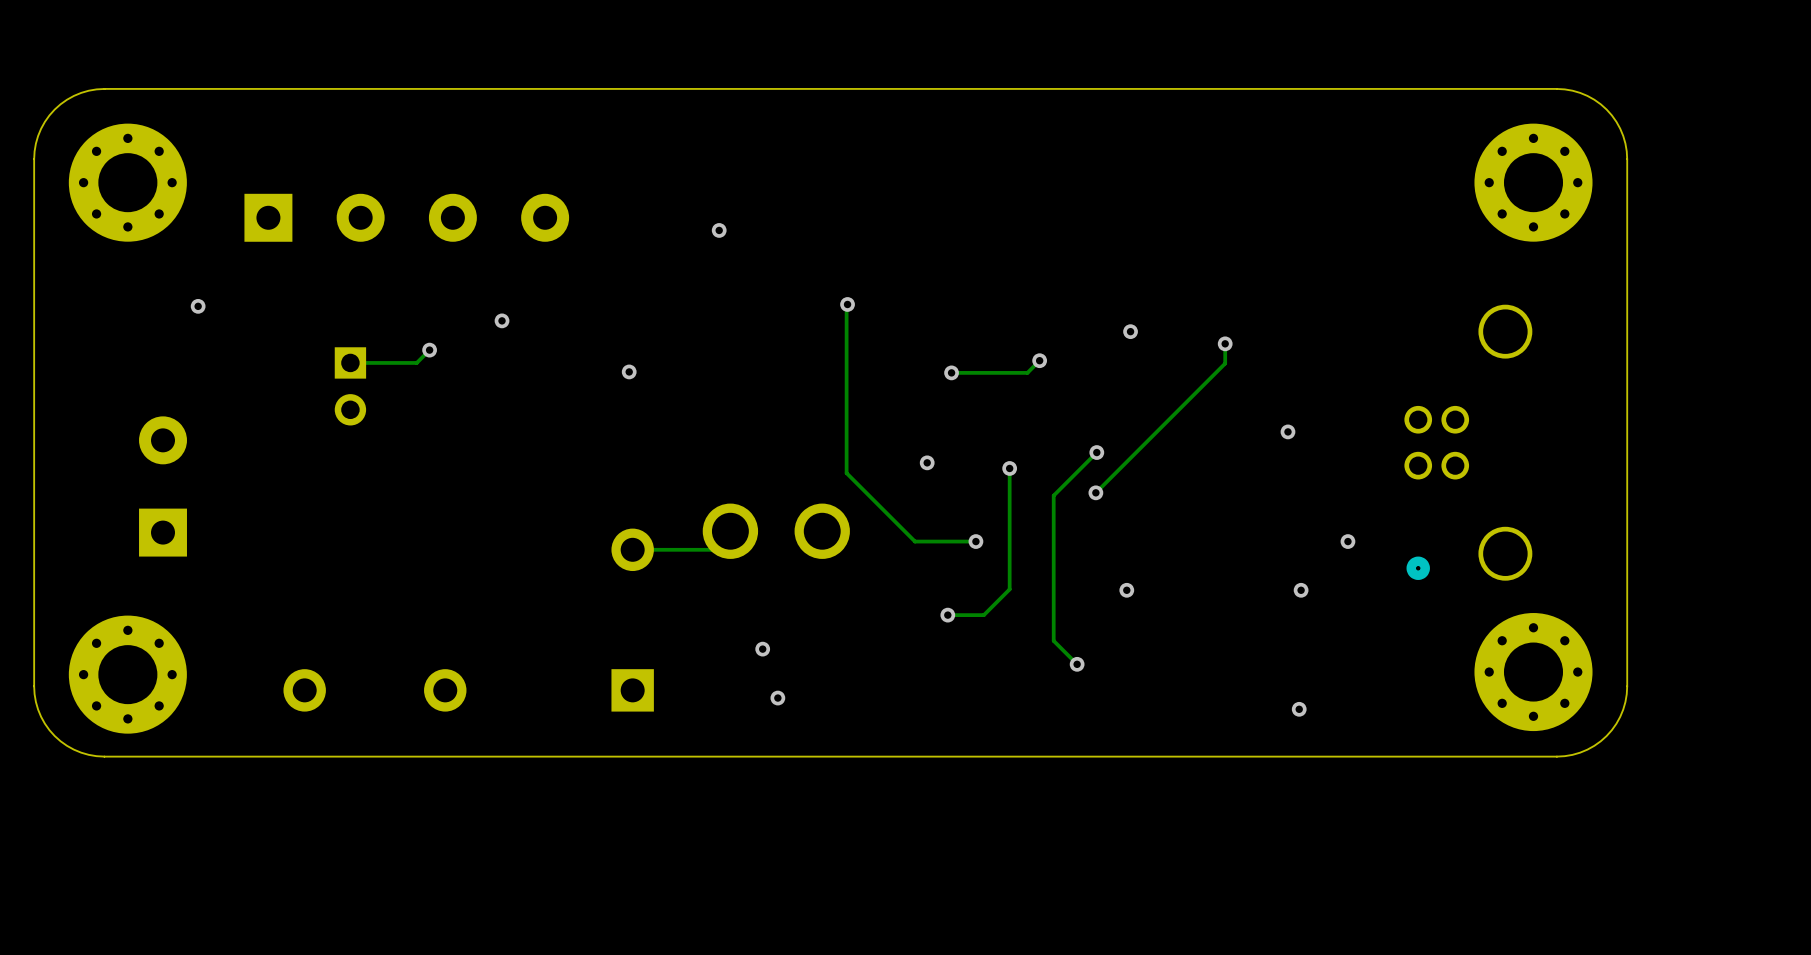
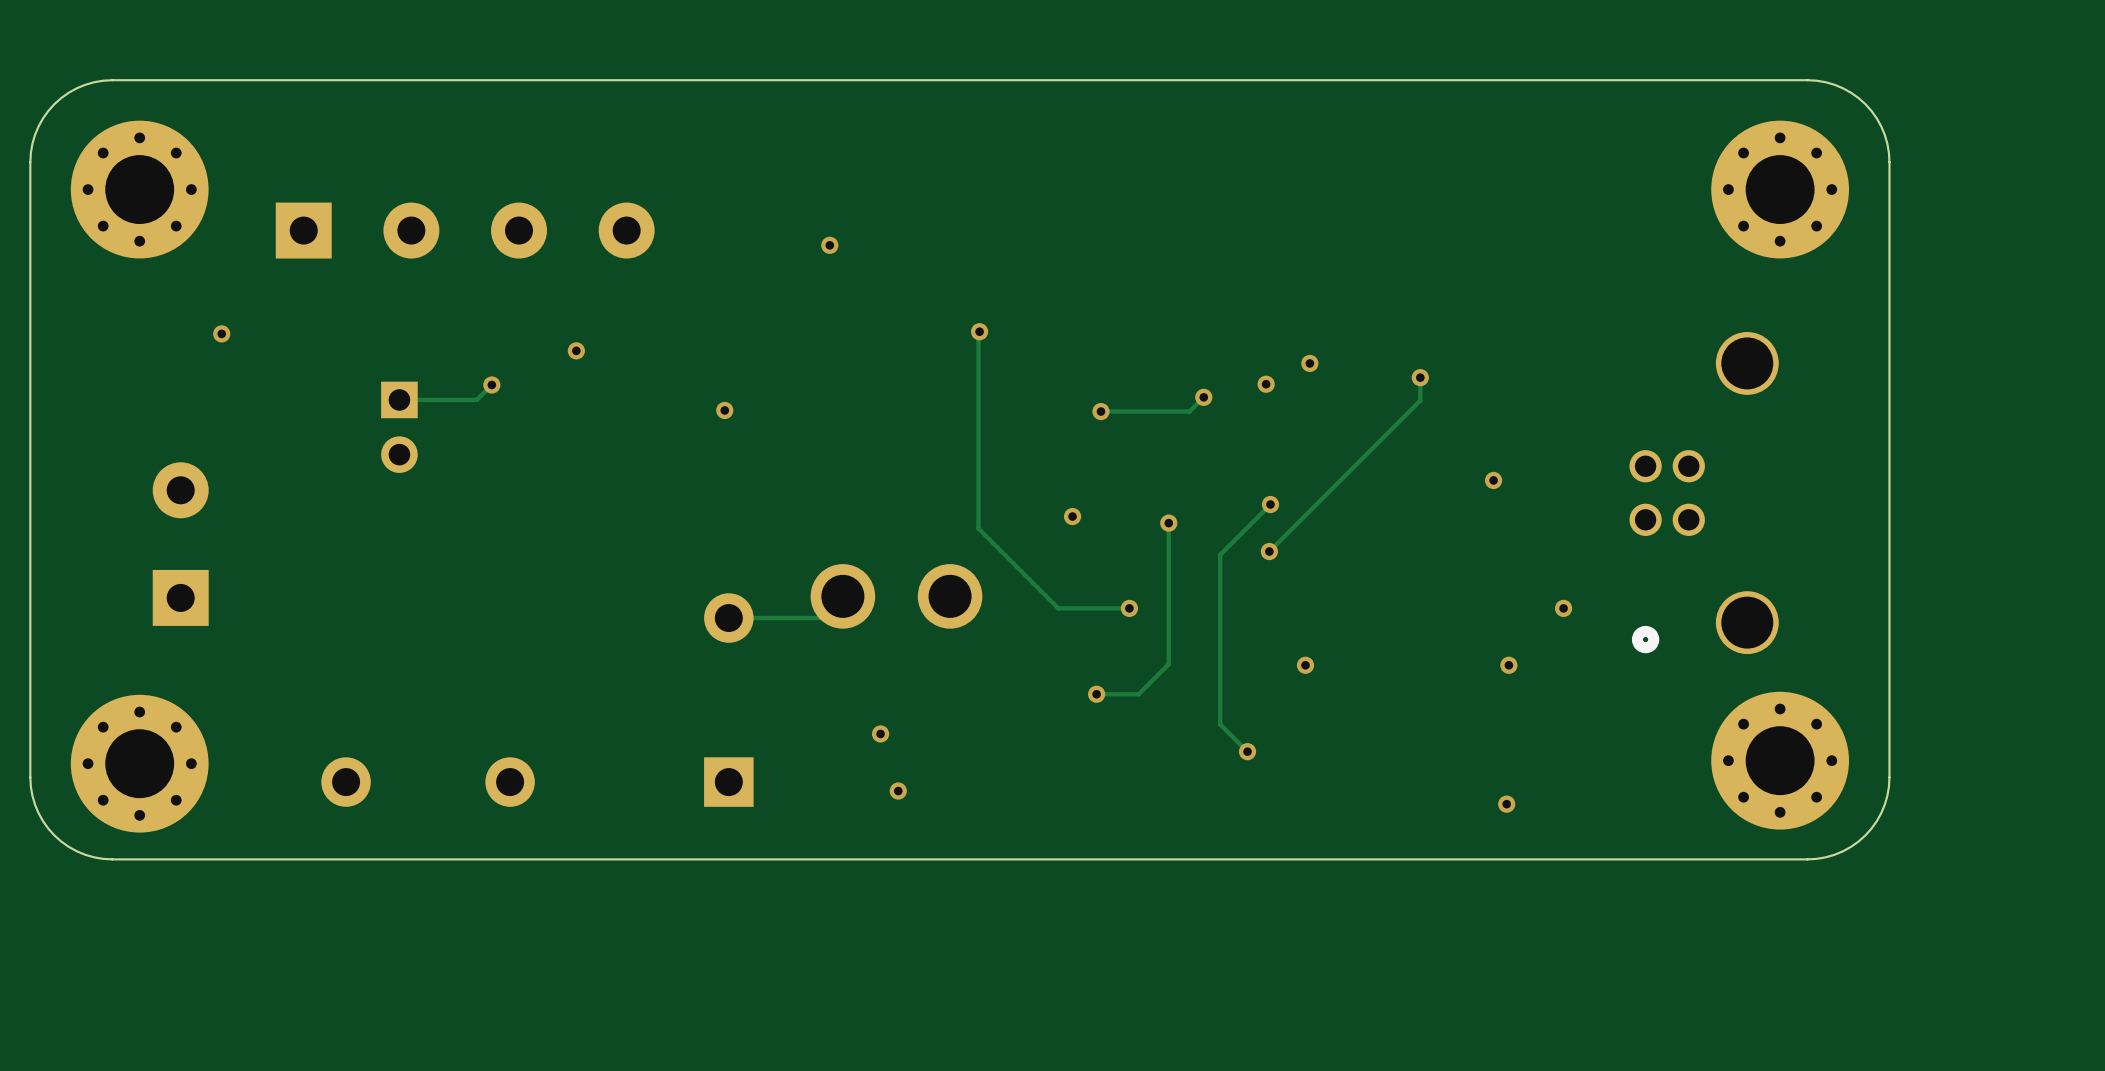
via: none -> (1266, 384)

